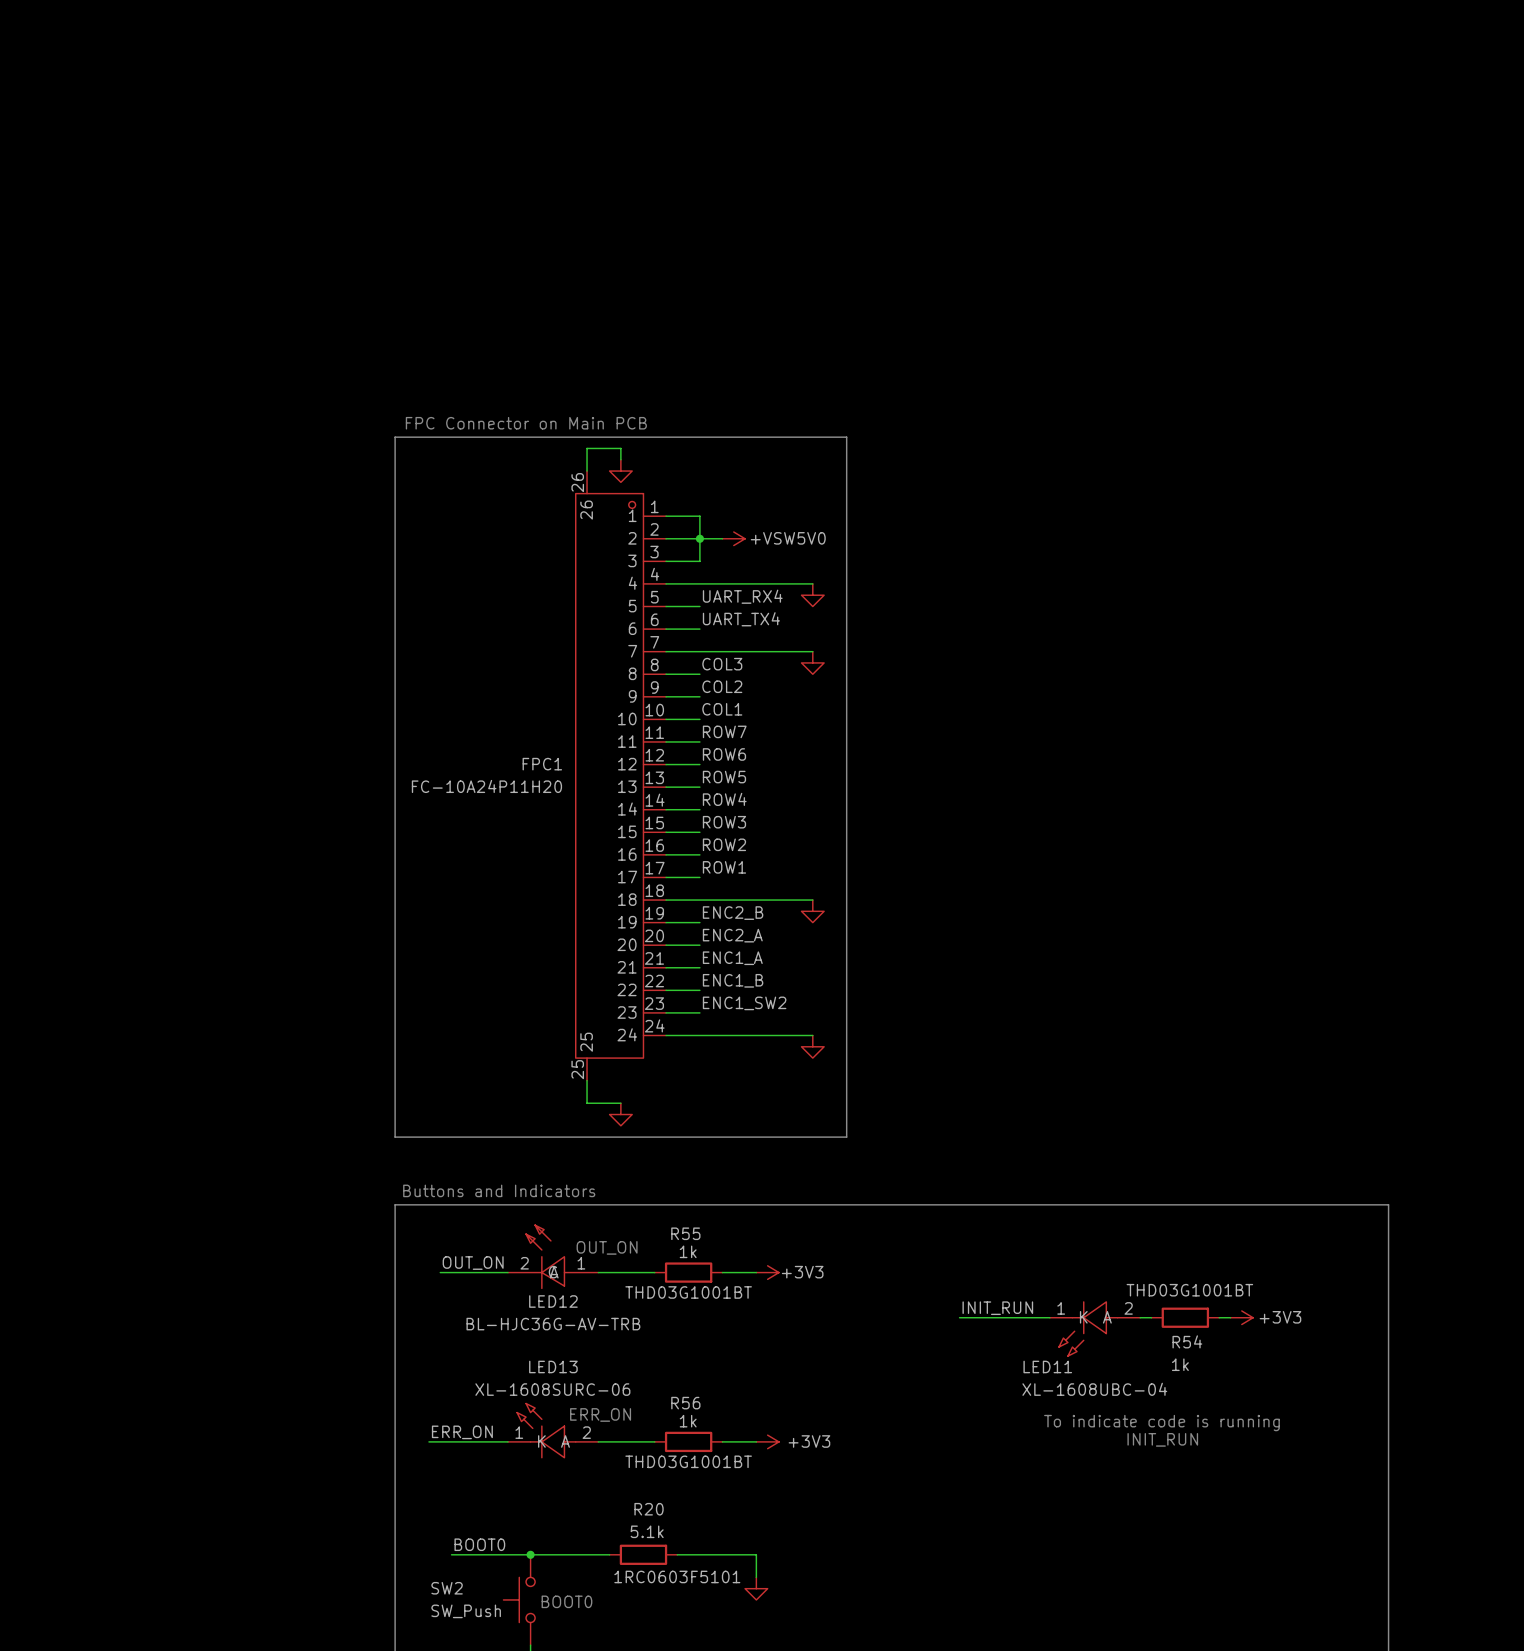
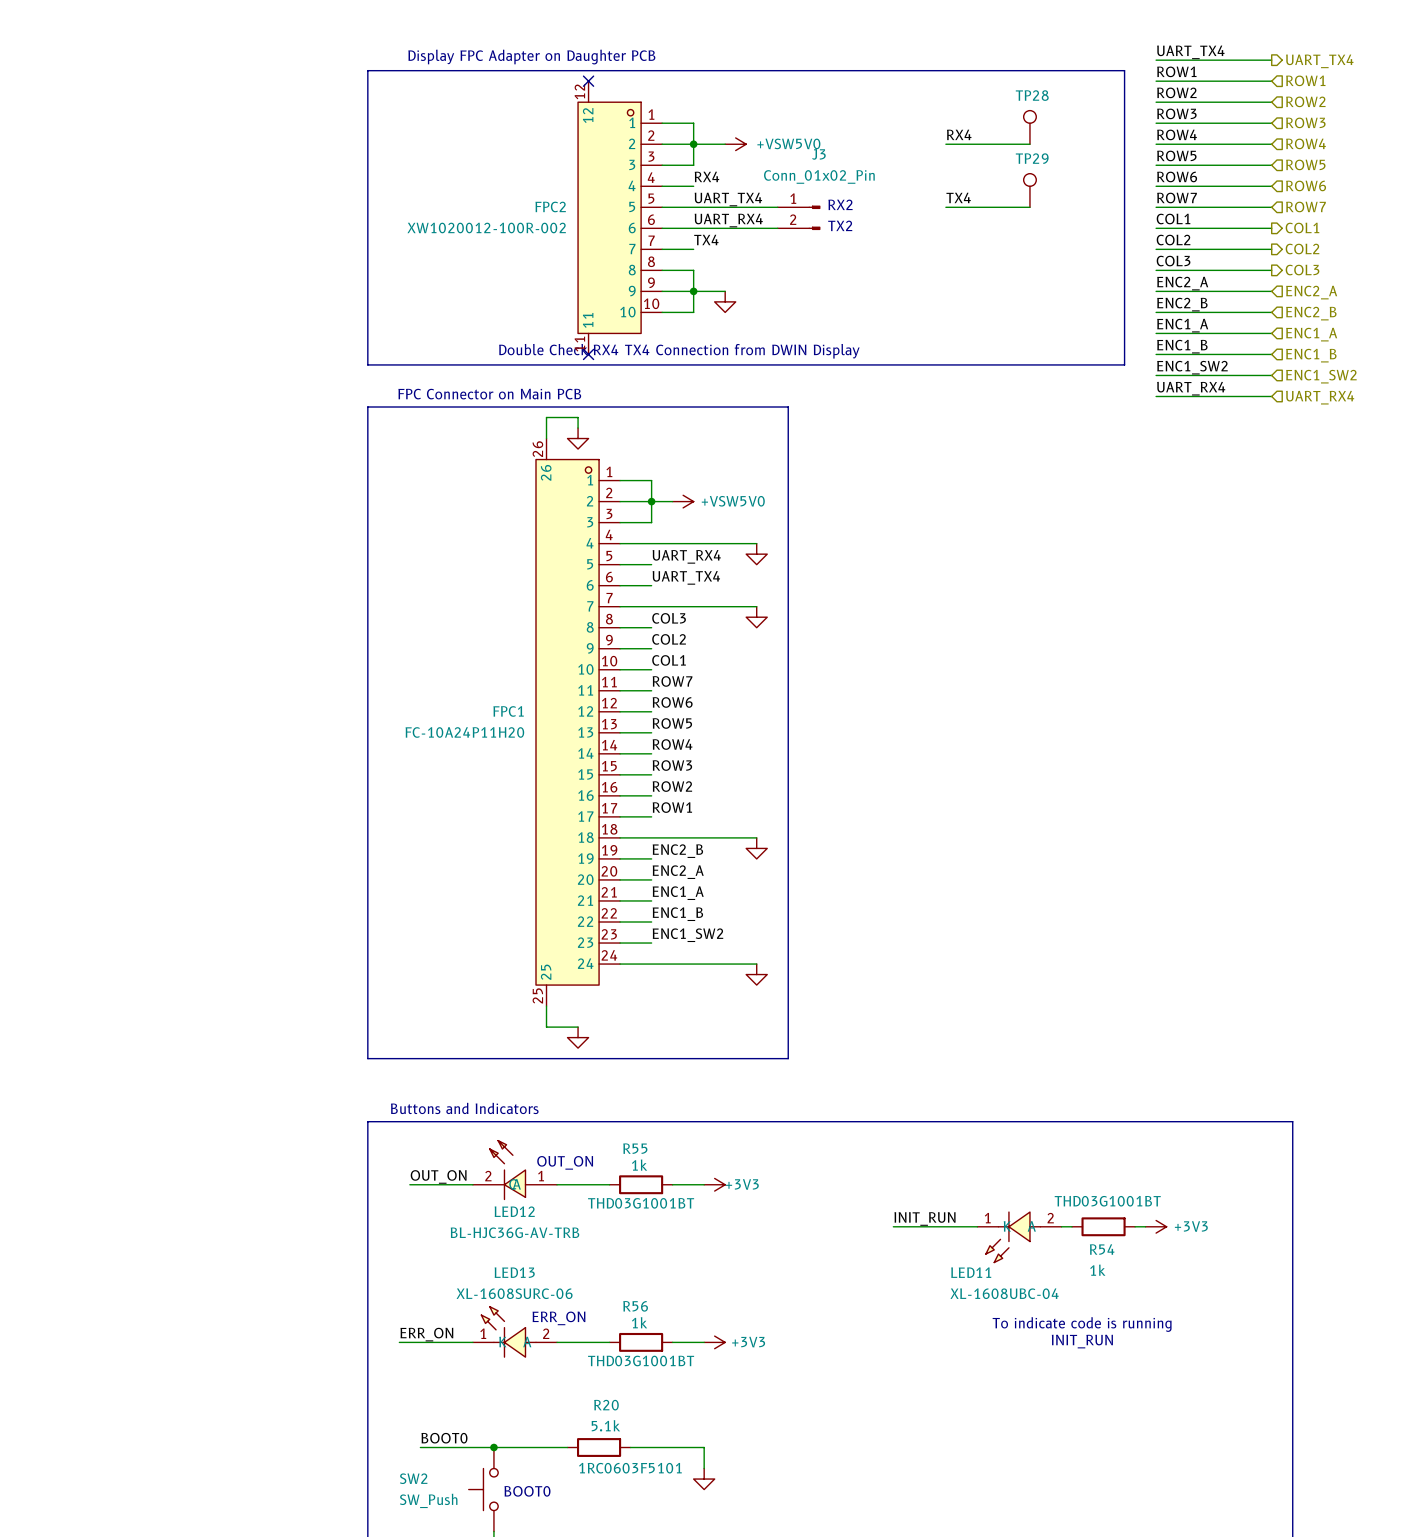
label: none -> UART_TX4 (1190, 52)
text: none -> Display FPC Adapter on Daughter PCB (531, 57)
wire: none -> (1156, 60) (1271, 60)
hierarchical label: none -> UART_TX4 (1319, 61)
line: none -> (367, 70) (1124, 70) (1124, 364) (367, 364) (367, 70)
label: none -> ROW1 (1176, 71)
hierarchical label: none -> ROW1 (1305, 80)
no-connect mark: none -> (588, 81)
wire: none -> (1156, 81) (1271, 81)
label: none -> ROW2 (1176, 92)
wire: none -> (1156, 102) (1271, 102)
hierarchical label: none -> ROW2 (1305, 101)
label: none -> ROW3 (1176, 113)
hierarchical label: none -> ROW3 (1305, 122)
wire: none -> (662, 123) (693, 123) (693, 165) (662, 165)
wire: none -> (1156, 123) (1271, 123)
TP28: none -> (1029, 127)
label: none -> RX4 (959, 134)
label: none -> ROW4 (1177, 134)
wire: none -> (662, 144) (725, 144)
junction: none -> (693, 144)
power symbol: none -> +VSW5V0 (735, 144)
wire: none -> (945, 144) (1029, 144)
wire: none -> (1156, 144) (1271, 144)
hierarchical label: none -> ROW4 (1305, 143)
label: none -> ROW5 (1176, 155)
wire: none -> (1156, 165) (1271, 165)
hierarchical label: none -> ROW5 (1305, 164)
label: none -> RX4 (706, 176)
label: none -> ROW6 (1177, 176)
hierarchical label: none -> ROW6 (1306, 185)
wire: none -> (662, 186) (693, 186)
wire: none -> (1156, 186) (1271, 186)
TP29: none -> (1029, 190)
label: none -> UART_TX4 (728, 199)
label: none -> TX4 (958, 197)
label: none -> ROW7 (1177, 197)
text: none -> RX2 (840, 204)
wire: none -> (662, 207) (777, 207)
wire: none -> (945, 207) (1029, 207)
wire: none -> (1156, 207) (1271, 207)
hierarchical label: none -> ROW7 (1305, 206)
FPC2: none -> XW1020012-100R-002 (620, 217)
J3: none -> Conn_01x02_Pin (799, 217)
label: none -> UART_RX4 (728, 220)
label: none -> COL1 (1173, 219)
text: none -> TX2 (840, 225)
hierarchical label: none -> COL1 (1302, 227)
wire: none -> (662, 228) (777, 228)
wire: none -> (1156, 228) (1271, 228)
label: none -> TX4 (706, 239)
label: none -> COL2 (1173, 240)
wire: none -> (662, 249) (693, 249)
wire: none -> (1156, 249) (1271, 249)
hierarchical label: none -> COL2 (1302, 249)
label: none -> COL3 (1173, 261)
hierarchical label: none -> COL3 (1302, 270)
wire: none -> (662, 270) (693, 270) (693, 312) (662, 312)
wire: none -> (1156, 270) (1271, 270)
label: none -> ENC2_A (1182, 283)
wire: none -> (662, 291) (725, 291)
junction: none -> (693, 291)
wire: none -> (1156, 291) (1271, 291)
hierarchical label: none -> ENC2_A (1311, 292)
power symbol: none -> (725, 301)
label: none -> ENC2_B (1182, 304)
wire: none -> (1156, 312) (1271, 312)
hierarchical label: none -> ENC2_B (1311, 313)
label: none -> ENC1_A (1182, 325)
wire: none -> (1156, 333) (1271, 333)
hierarchical label: none -> ENC1_A (1311, 334)
label: none -> ENC1_B (1182, 346)
text: none -> Double Check RX4 TX4 Connection from DWIN Display (679, 351)
no-connect mark: none -> (588, 354)
wire: none -> (1156, 354) (1271, 354)
hierarchical label: none -> ENC1_B (1311, 355)
label: none -> ENC1_SW2 (1192, 367)
wire: none -> (1156, 375) (1271, 375)
hierarchical label: none -> ENC1_SW2 (1321, 376)
label: none -> UART_RX4 (1191, 388)
wire: none -> (1156, 396) (1271, 396)
hierarchical label: none -> UART_RX4 (1320, 397)

